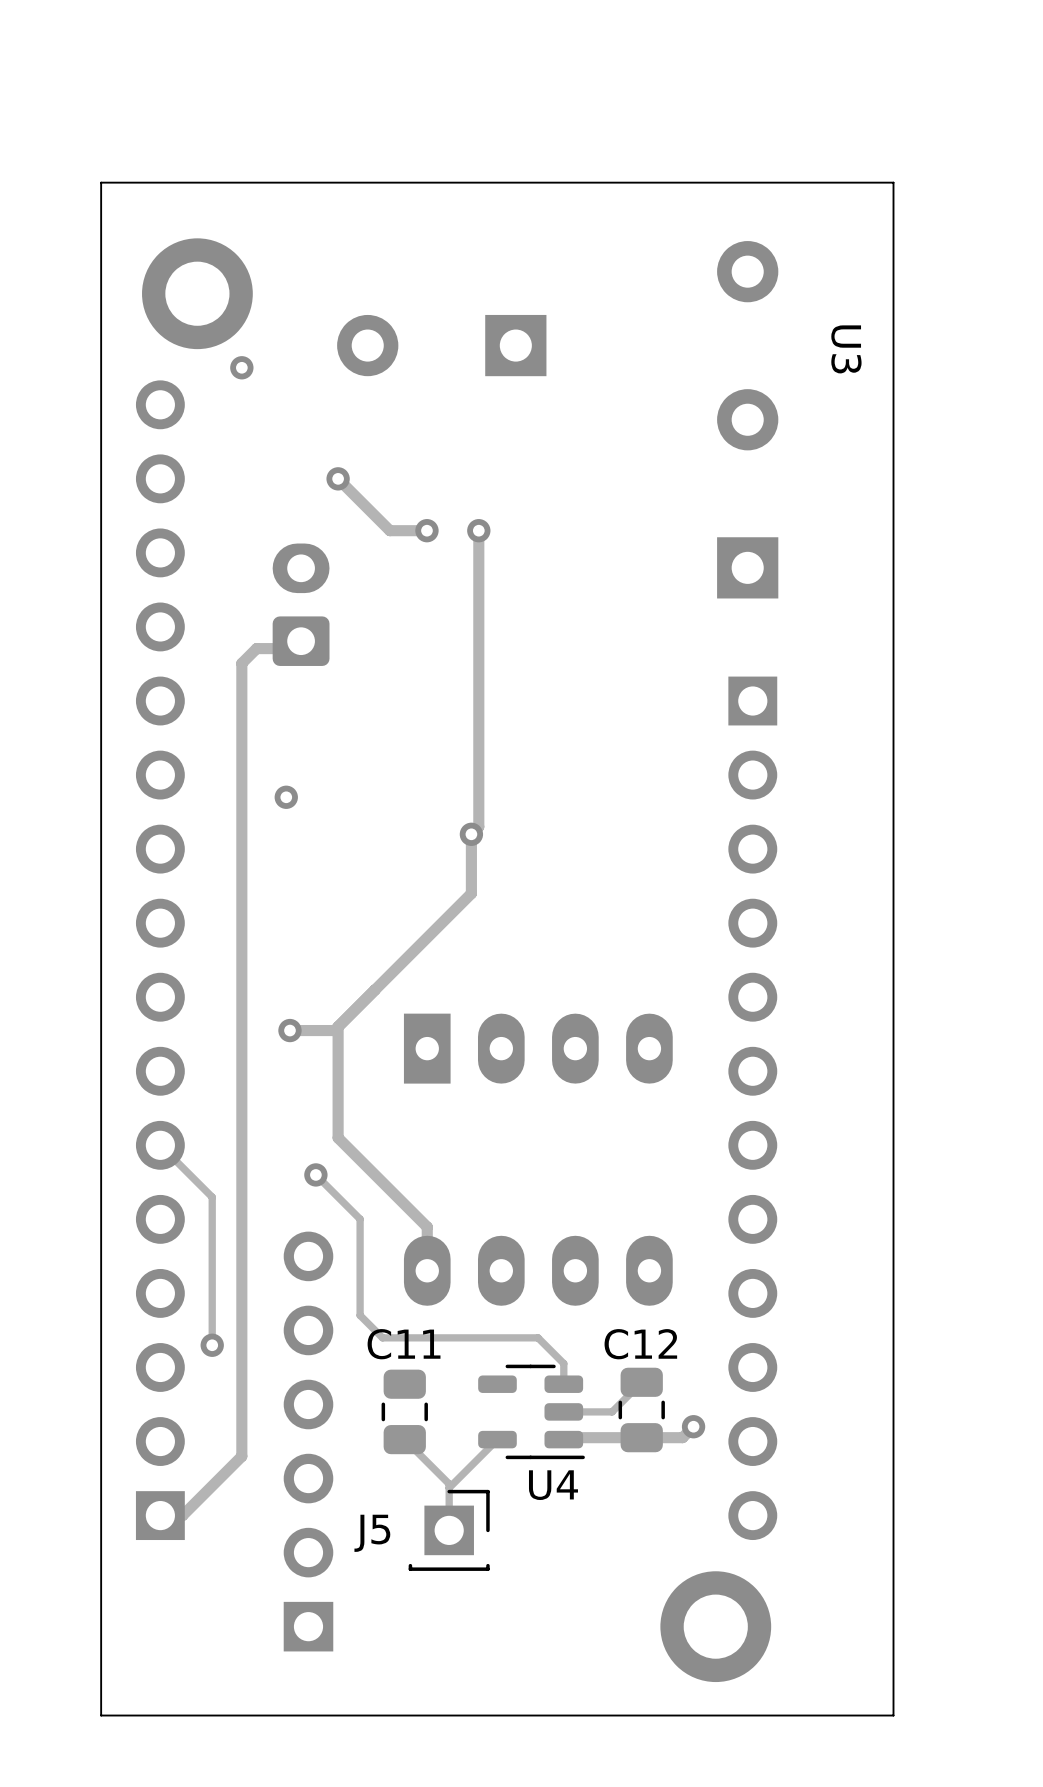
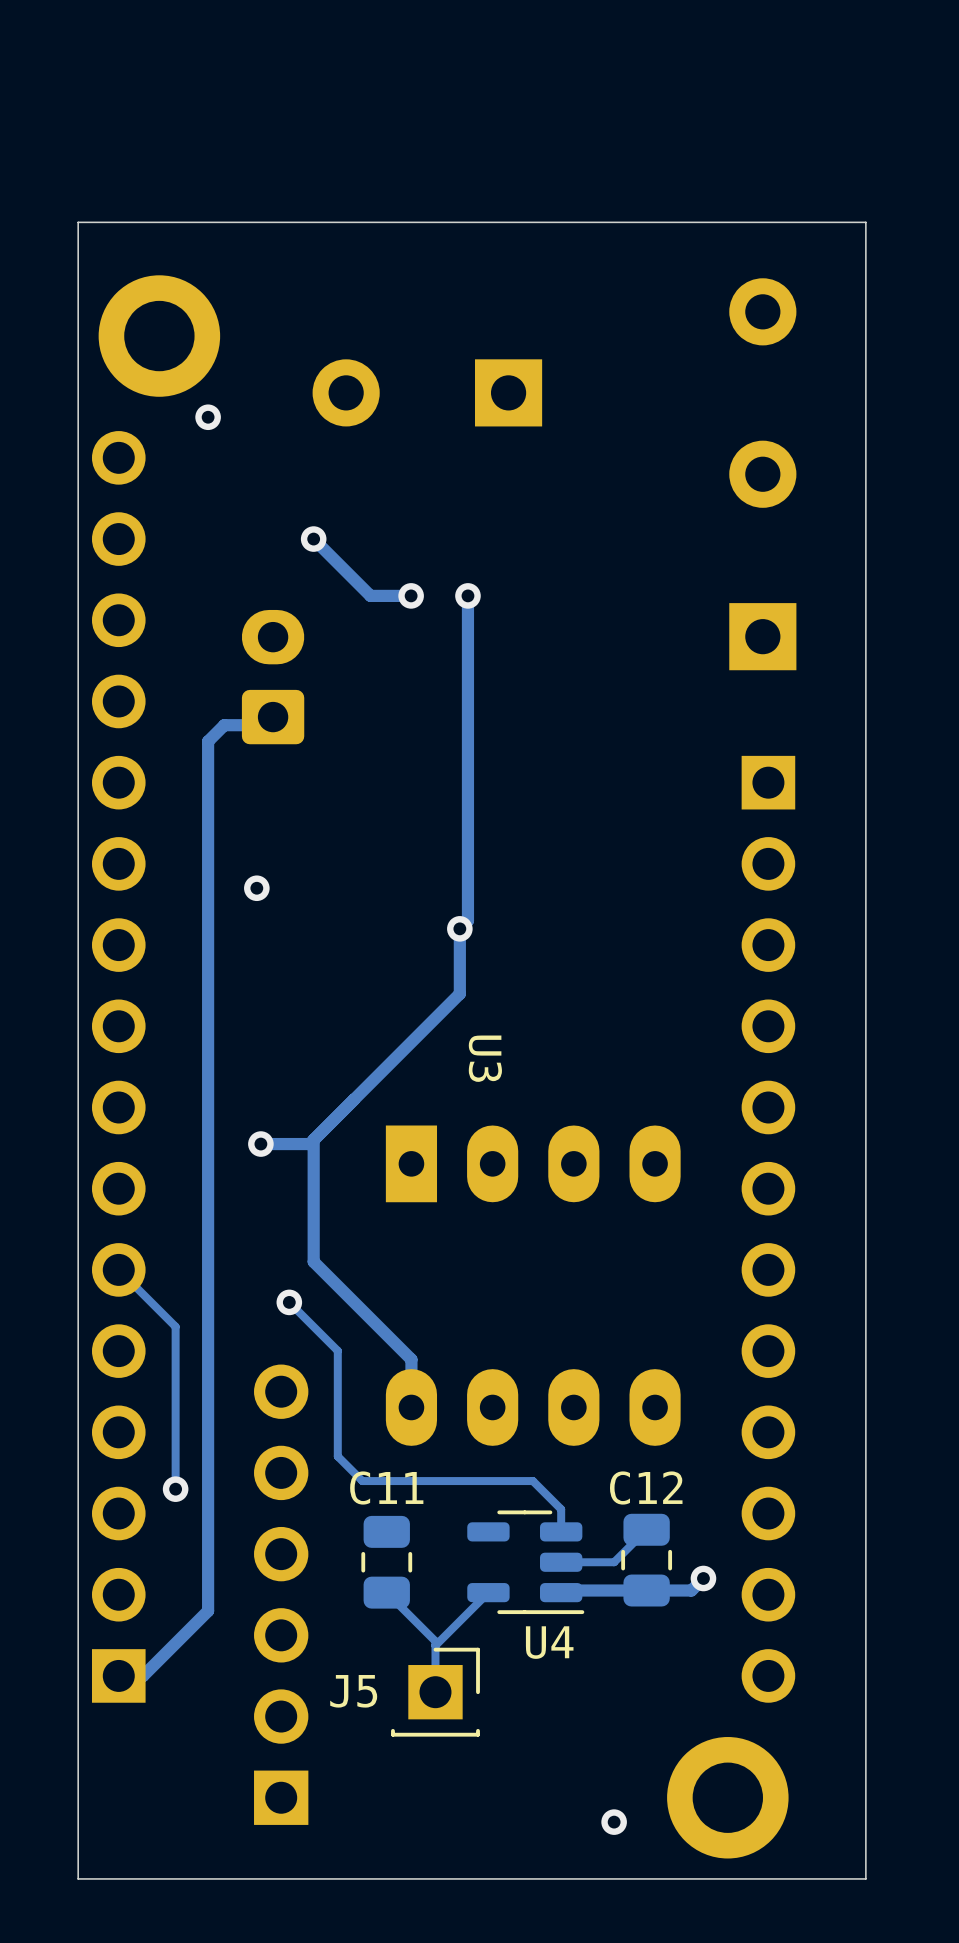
board edge: (893, 182) (101, 182) (101, 1715) (893, 1715) (893, 182) -> (865, 222) (865, 1878) (78, 1878) (78, 222) (865, 222)
U3 name position: U3 (846, 349) -> U3 (485, 1058)
via: none -> (614, 1822)

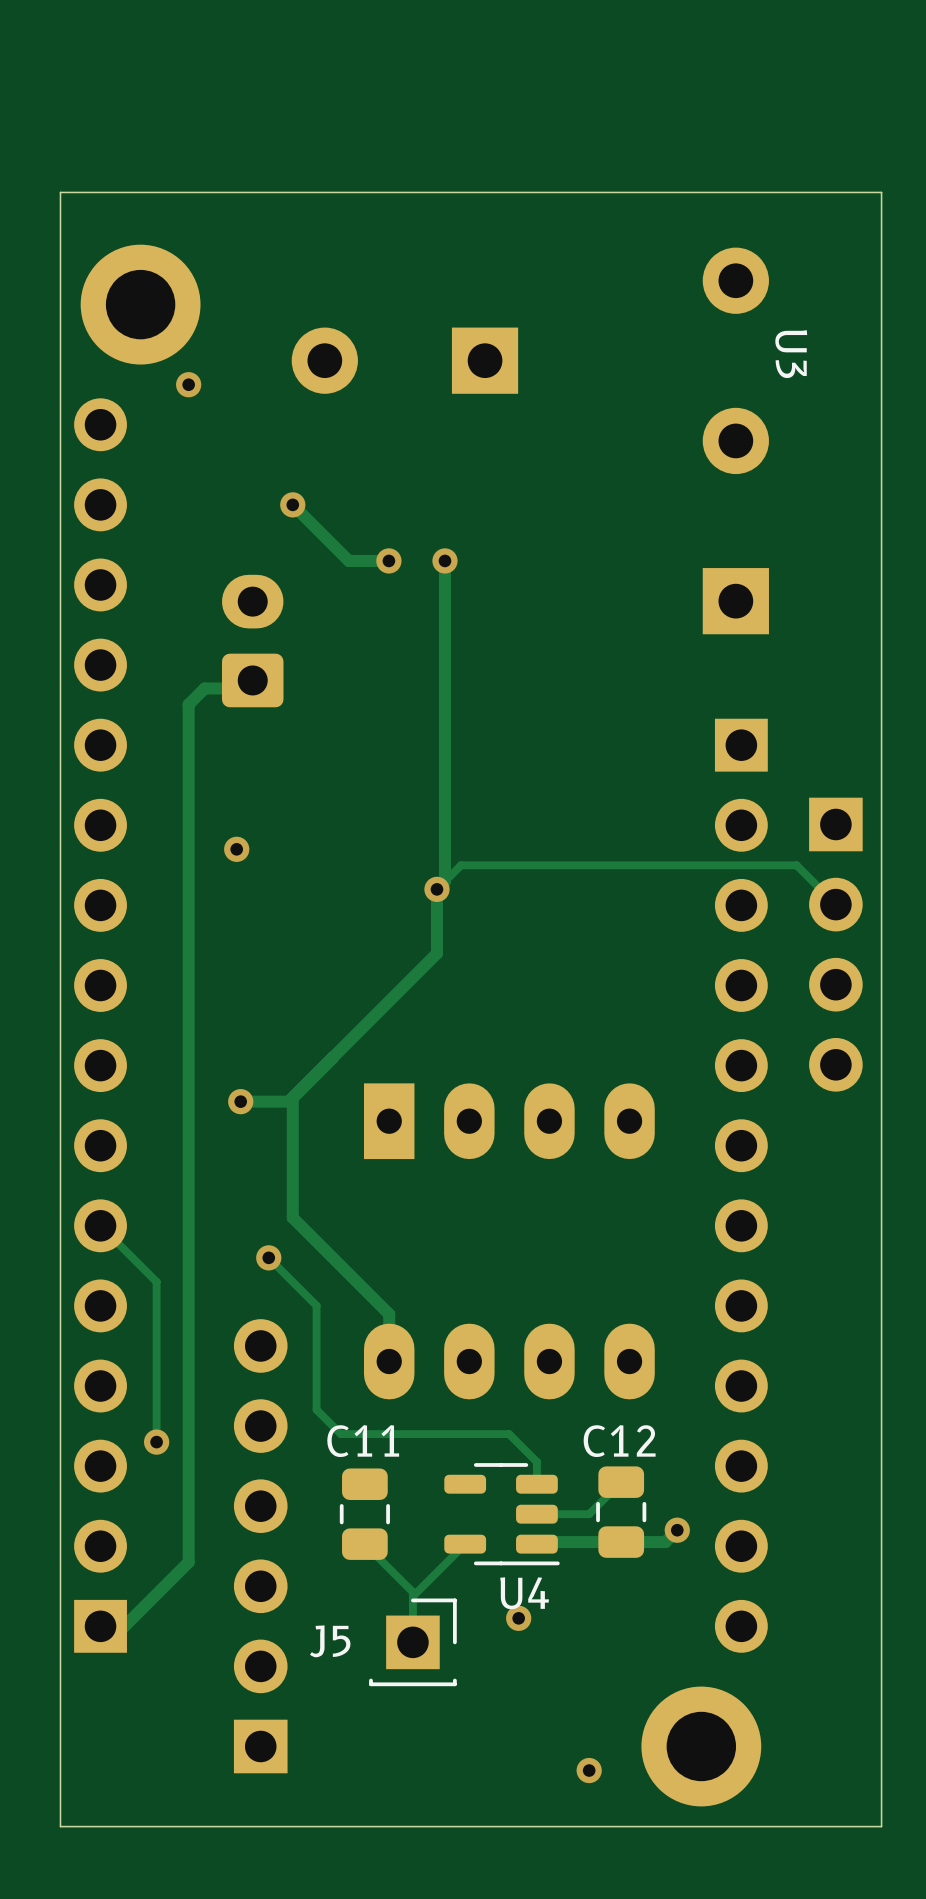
board edge: (865, 222) (865, 1878) -> (837, 192) (881, 192) (881, 1826) (837, 1826)
track: none -> (436, 889) (461, 865) (796, 865) (835, 904)
part: none -> (835, 944)
U3 name position: U3 (485, 1058) -> U3 (791, 354)
via: none -> (518, 1618)

